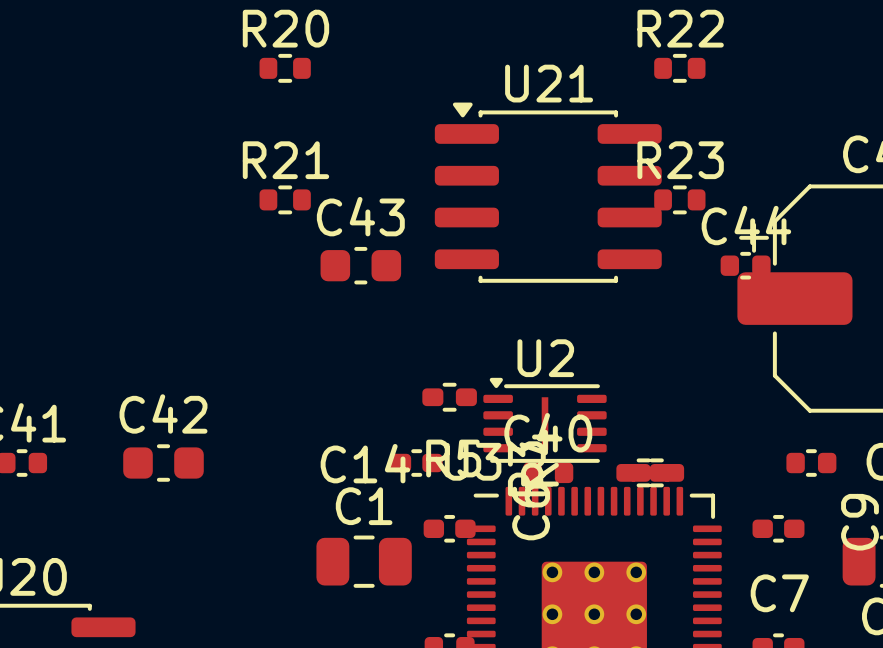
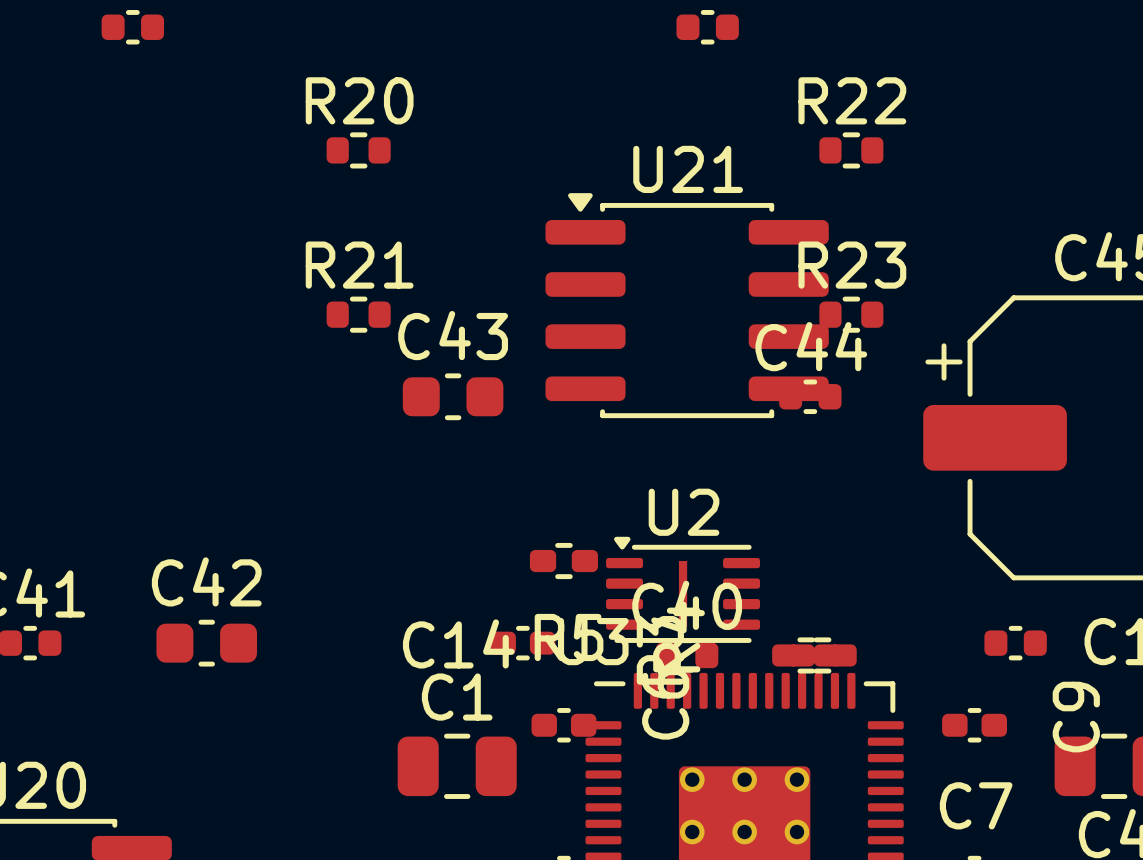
C44 position: (745, 265) -> (810, 396)

